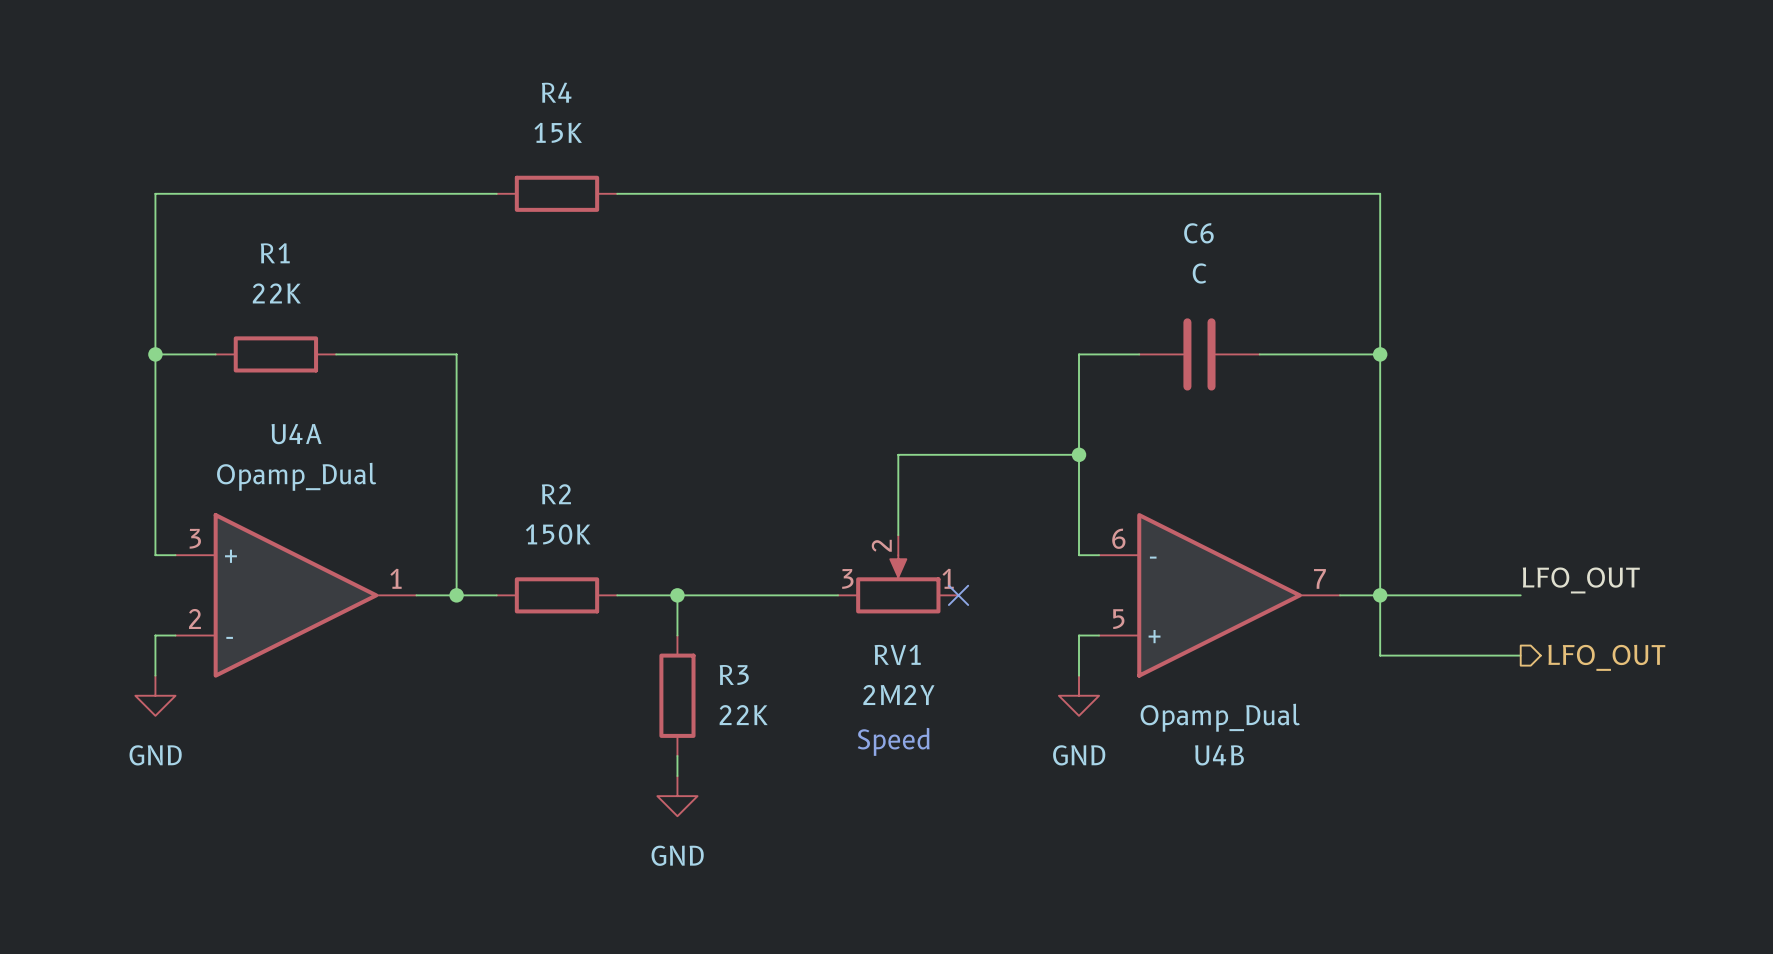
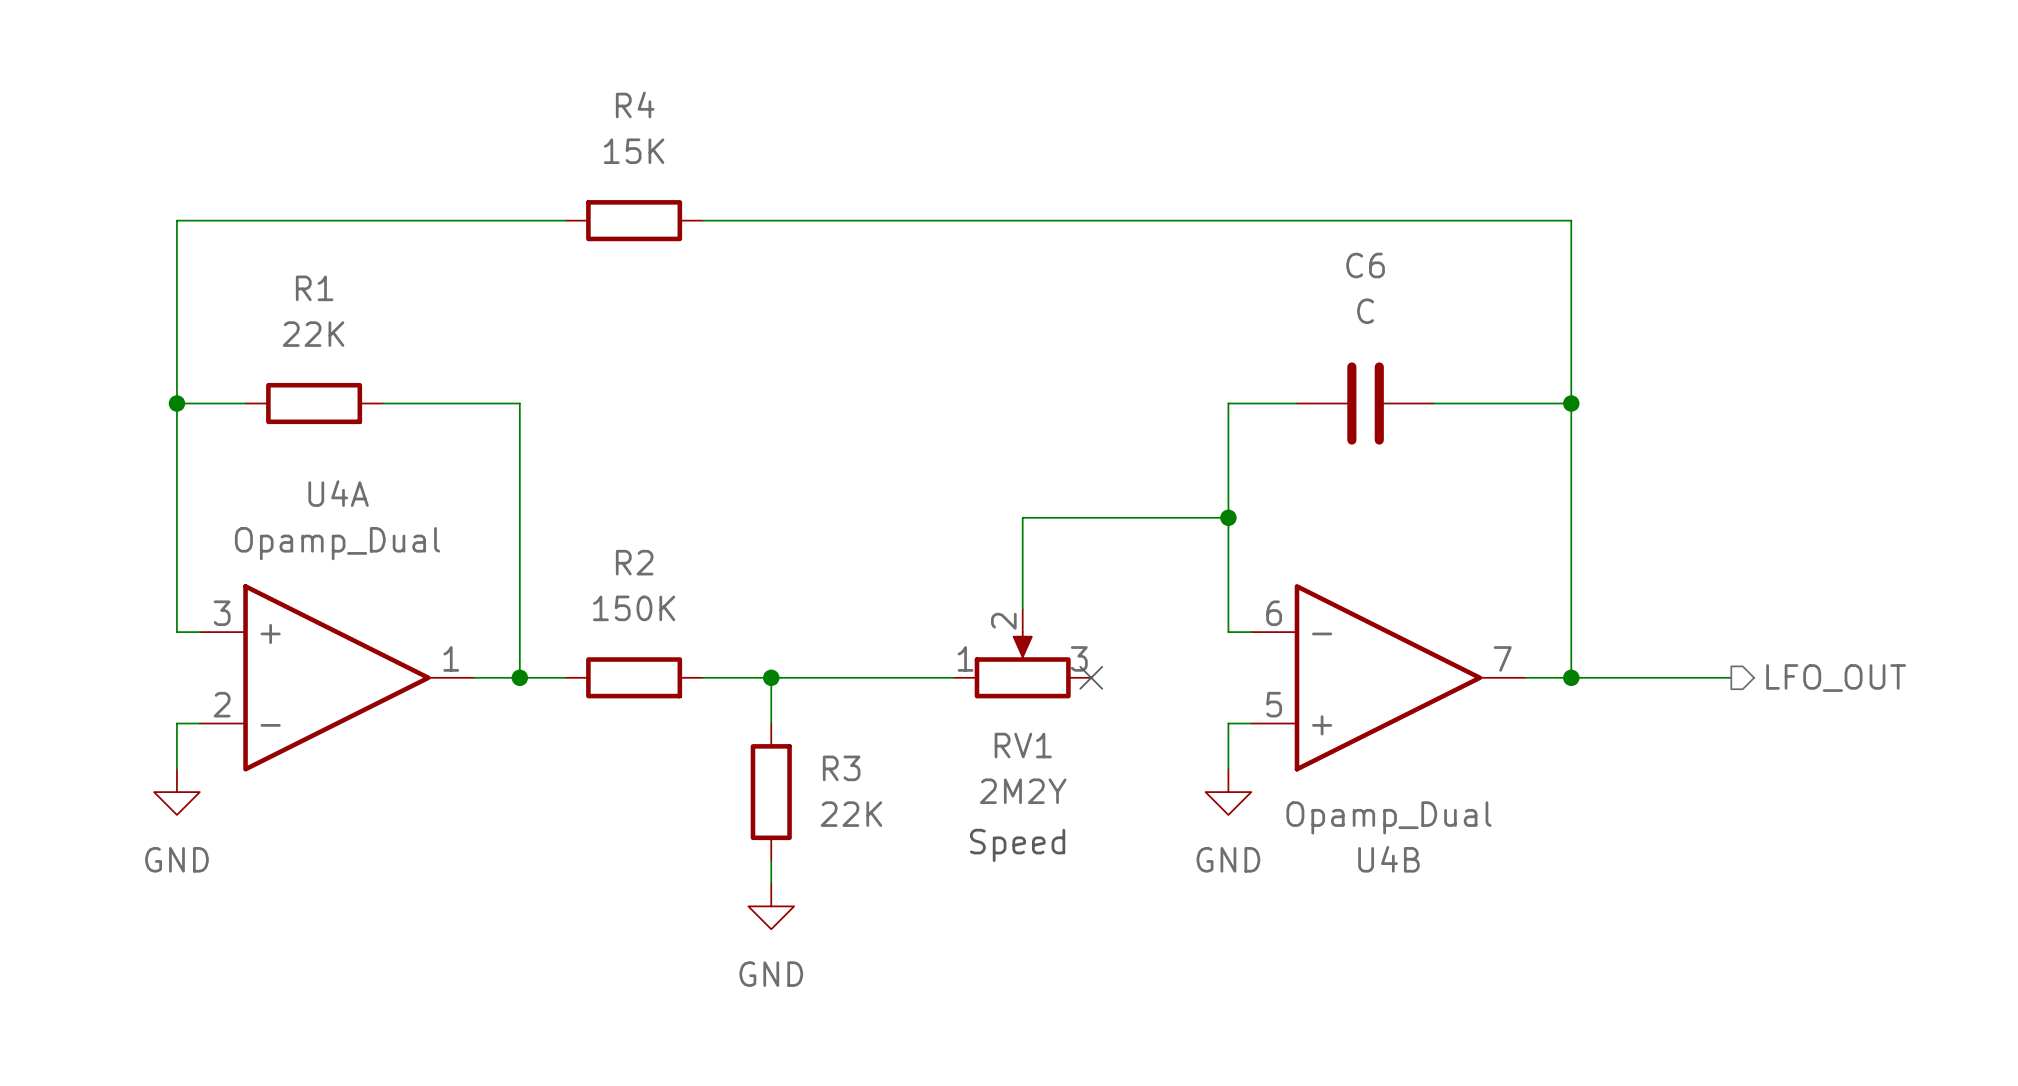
label: LFO_OUT (1581, 580) -> none
RV1 flip: as is (898, 584) -> left-right (1022, 665)
wire: (1380, 595) (1380, 655) (1520, 655) -> none
hierarchical label position: LFO_OUT (1606, 657) -> LFO_OUT (1836, 678)

